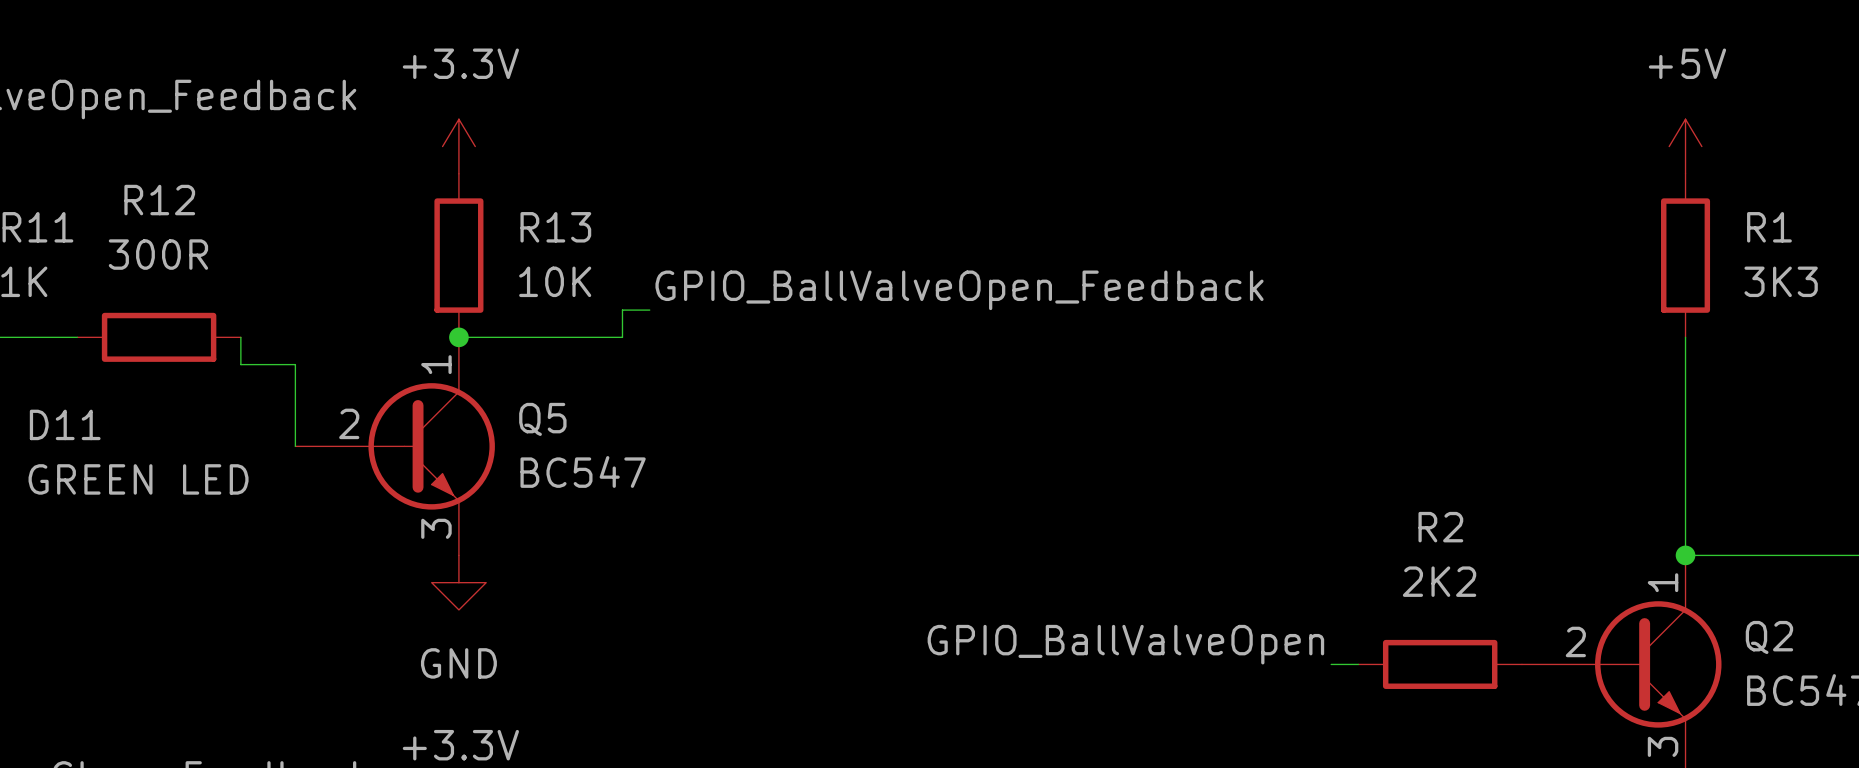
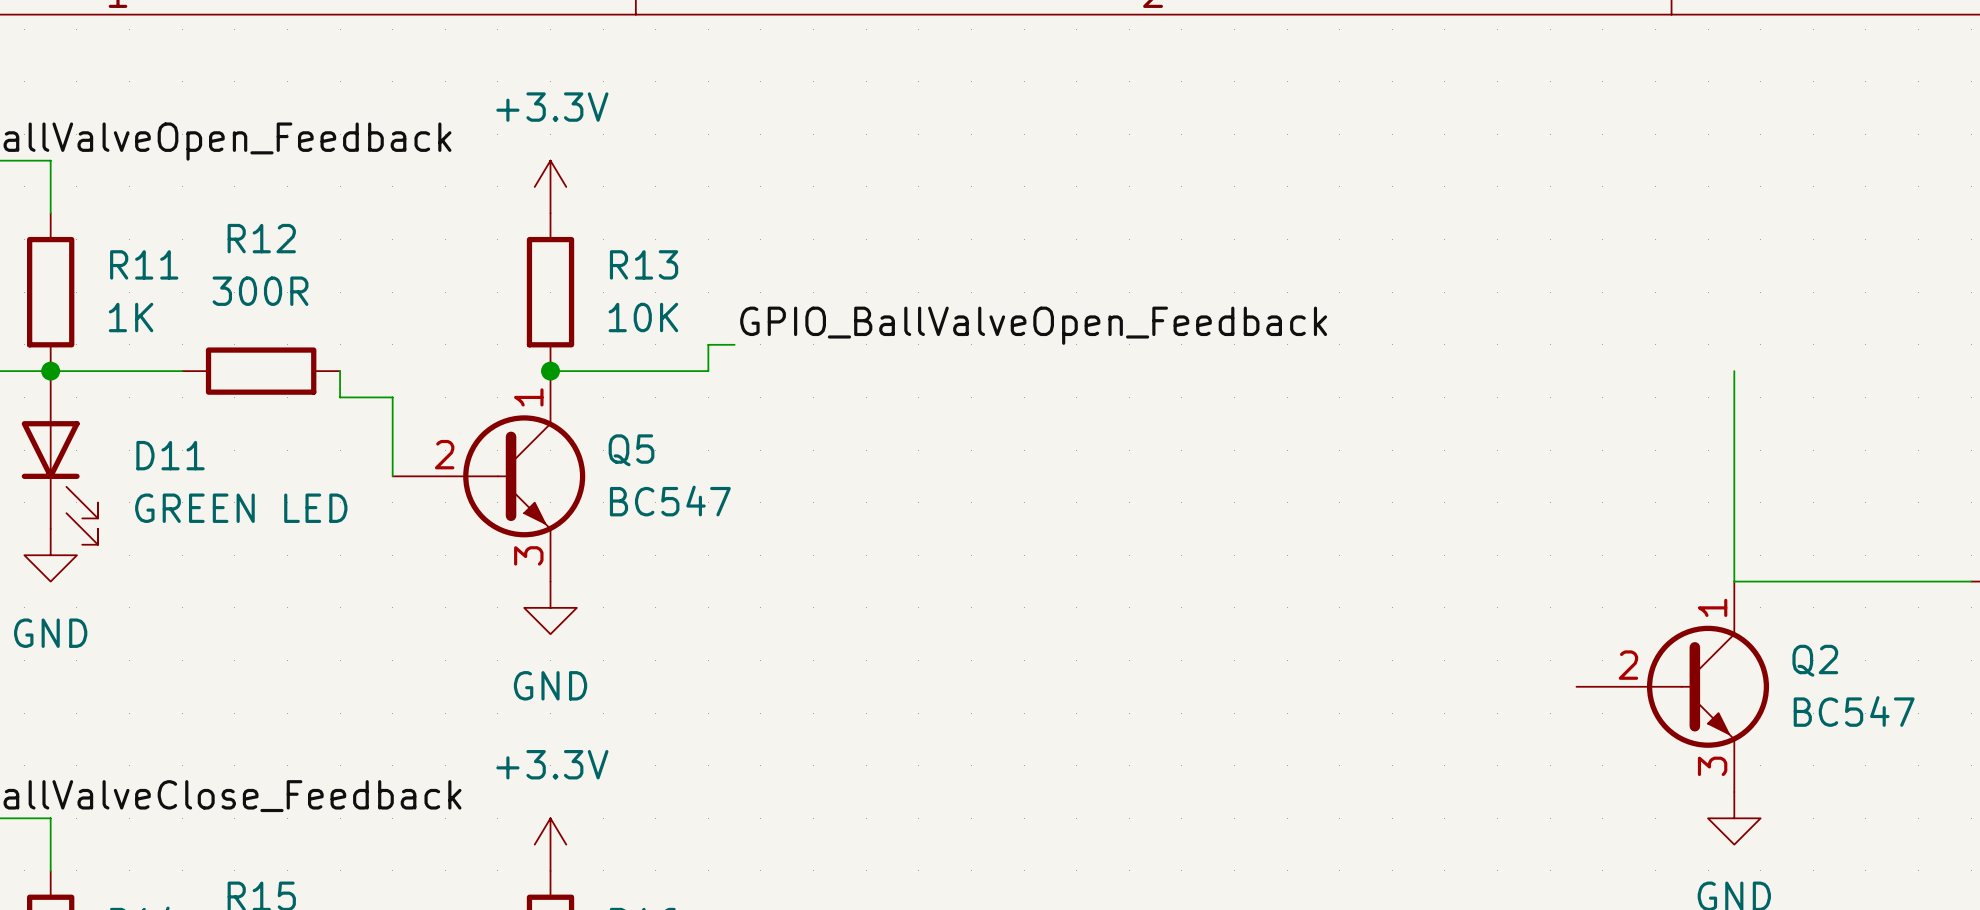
power symbol: +5V (1685, 146) -> none
R1: 3K3 (1685, 255) -> none
junction: (1685, 555) -> none
label: GPIO_BallValveOpen (1125, 644) -> none
wire: (1331, 664) (1358, 664) -> none
R2: 2K2 (1440, 664) -> none

